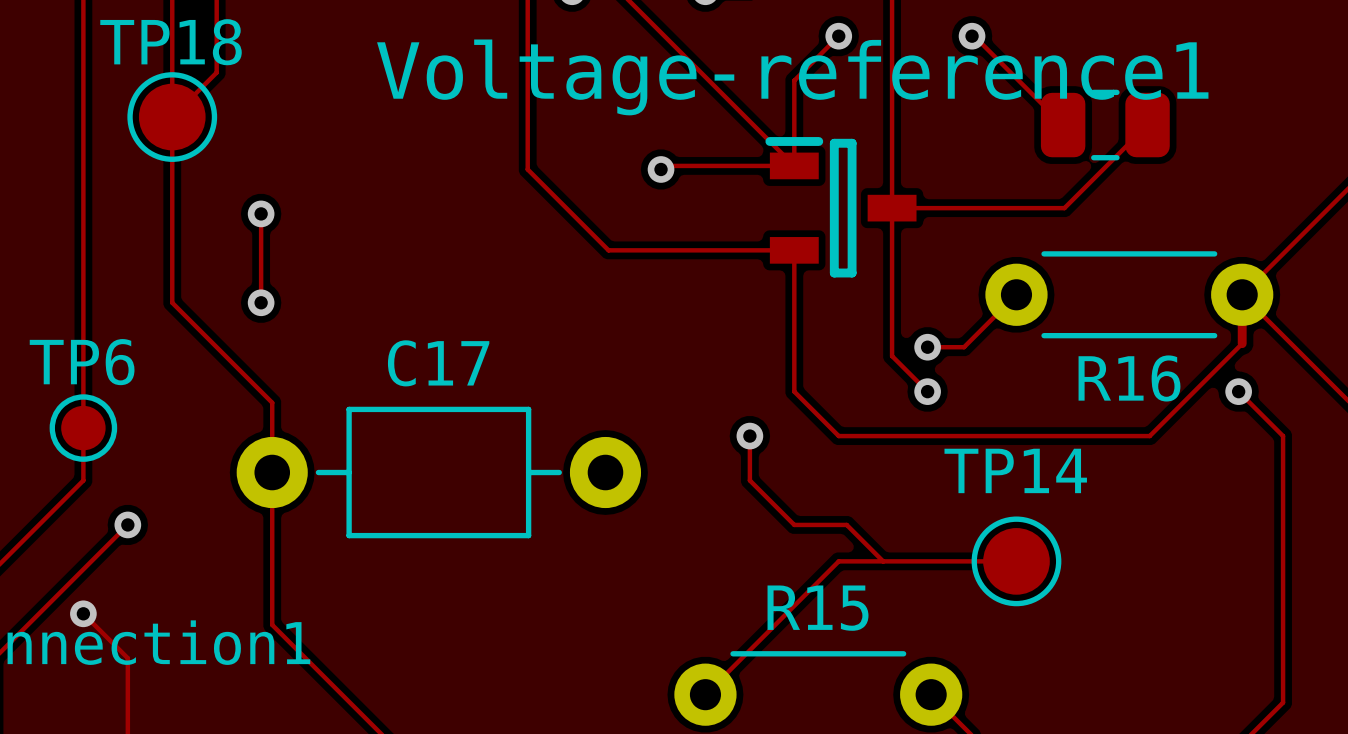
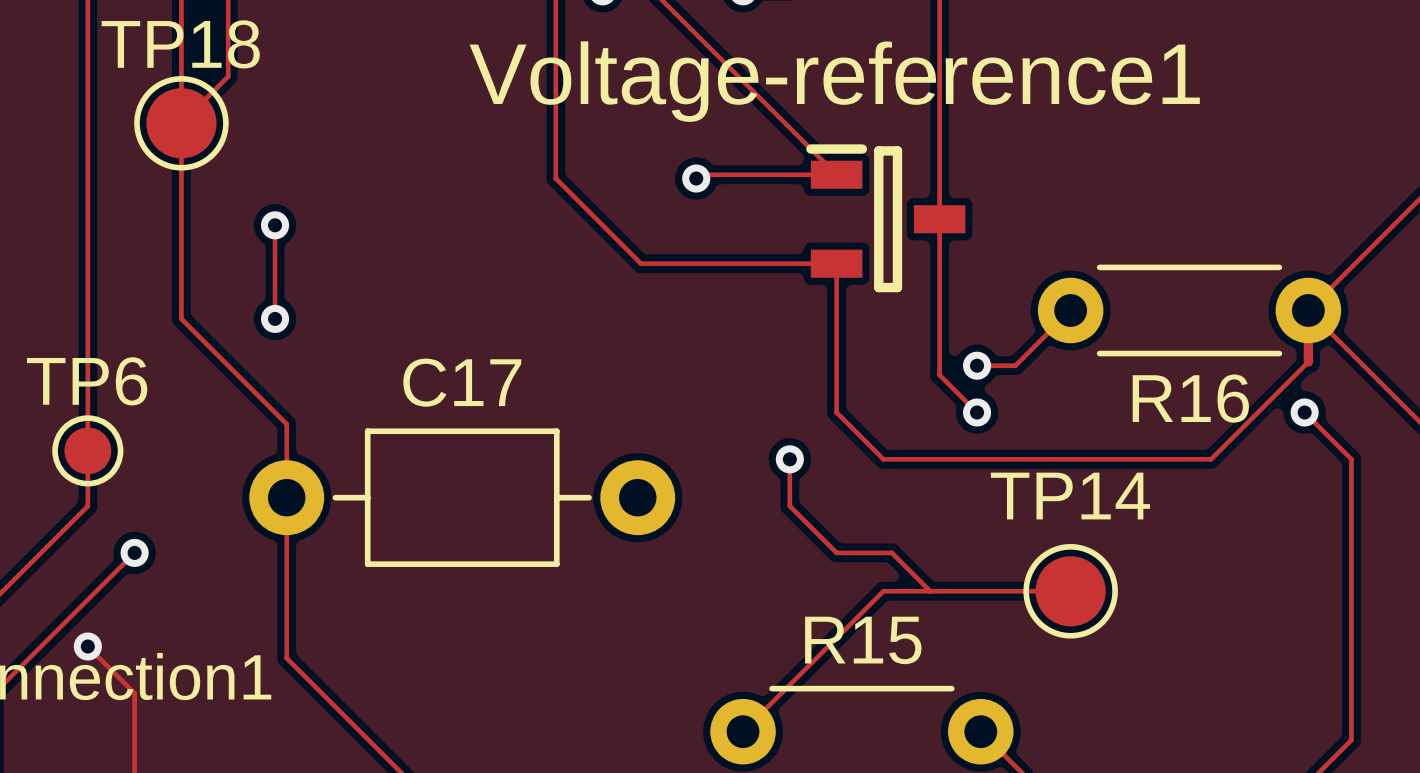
track: (838, 36) (794, 80) (794, 165) -> none
via: (838, 36) -> none
track: (972, 36) (974, 36) (1063, 125) -> none
via: (972, 36) -> none
part: (1105, 125) -> none
track: (1147, 125) (1064, 208) (892, 208) -> none

